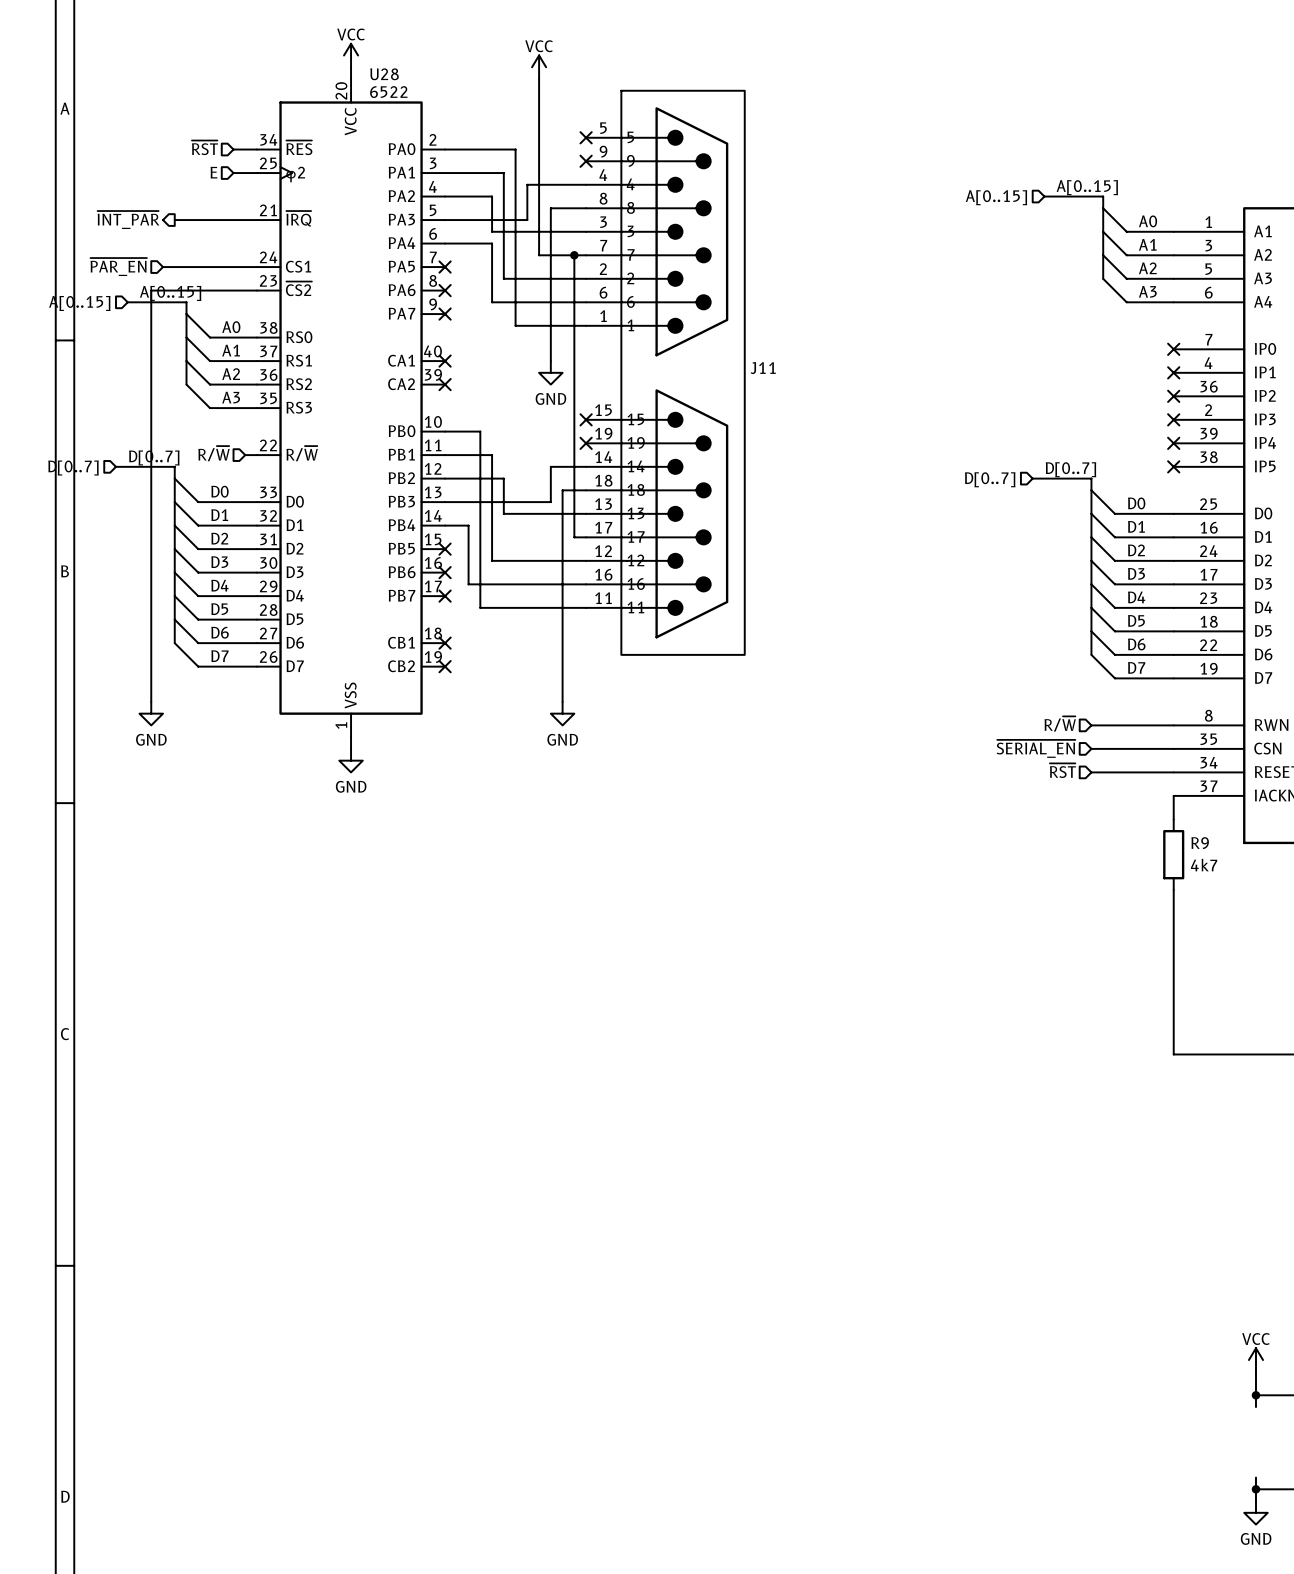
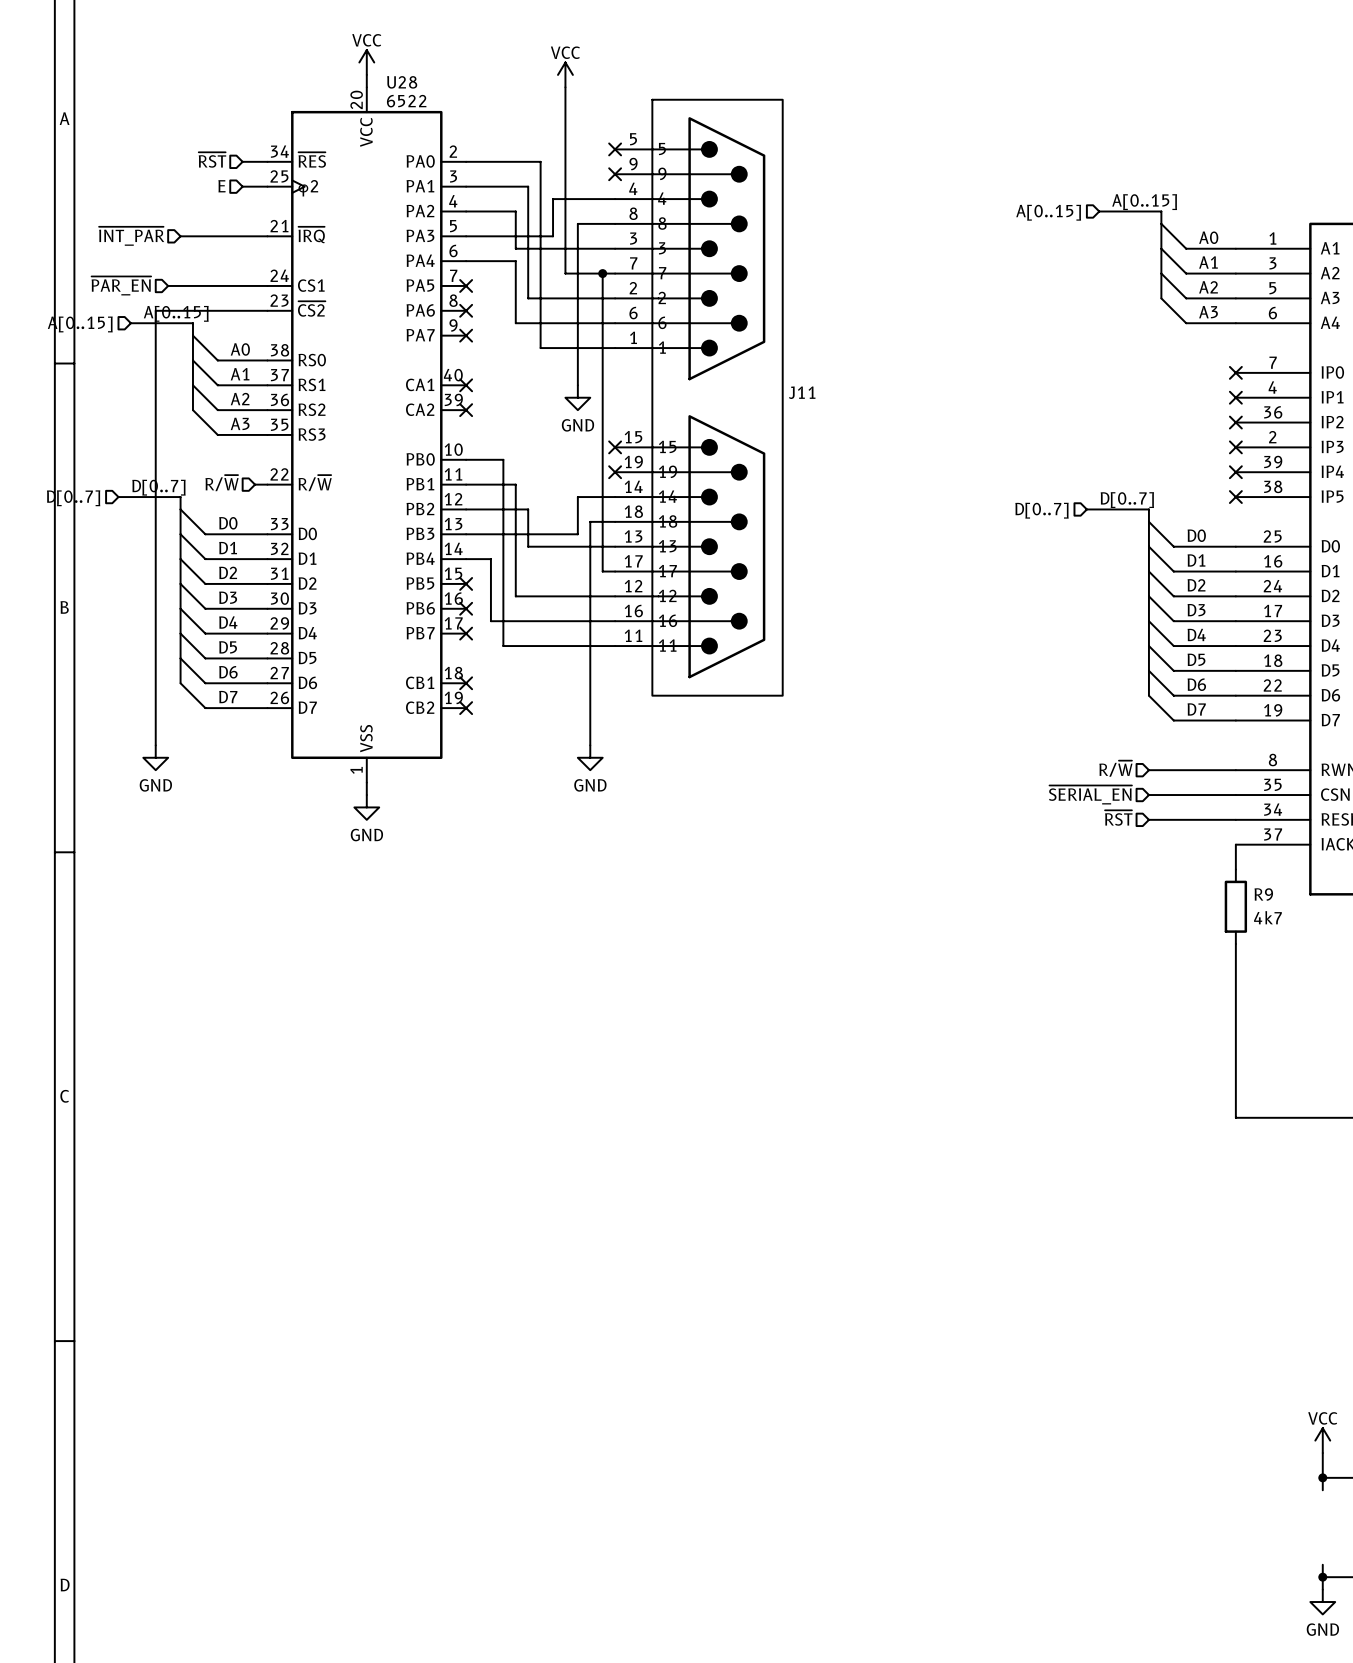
hierarchical label shape: output (128, 220) -> input (131, 236)

